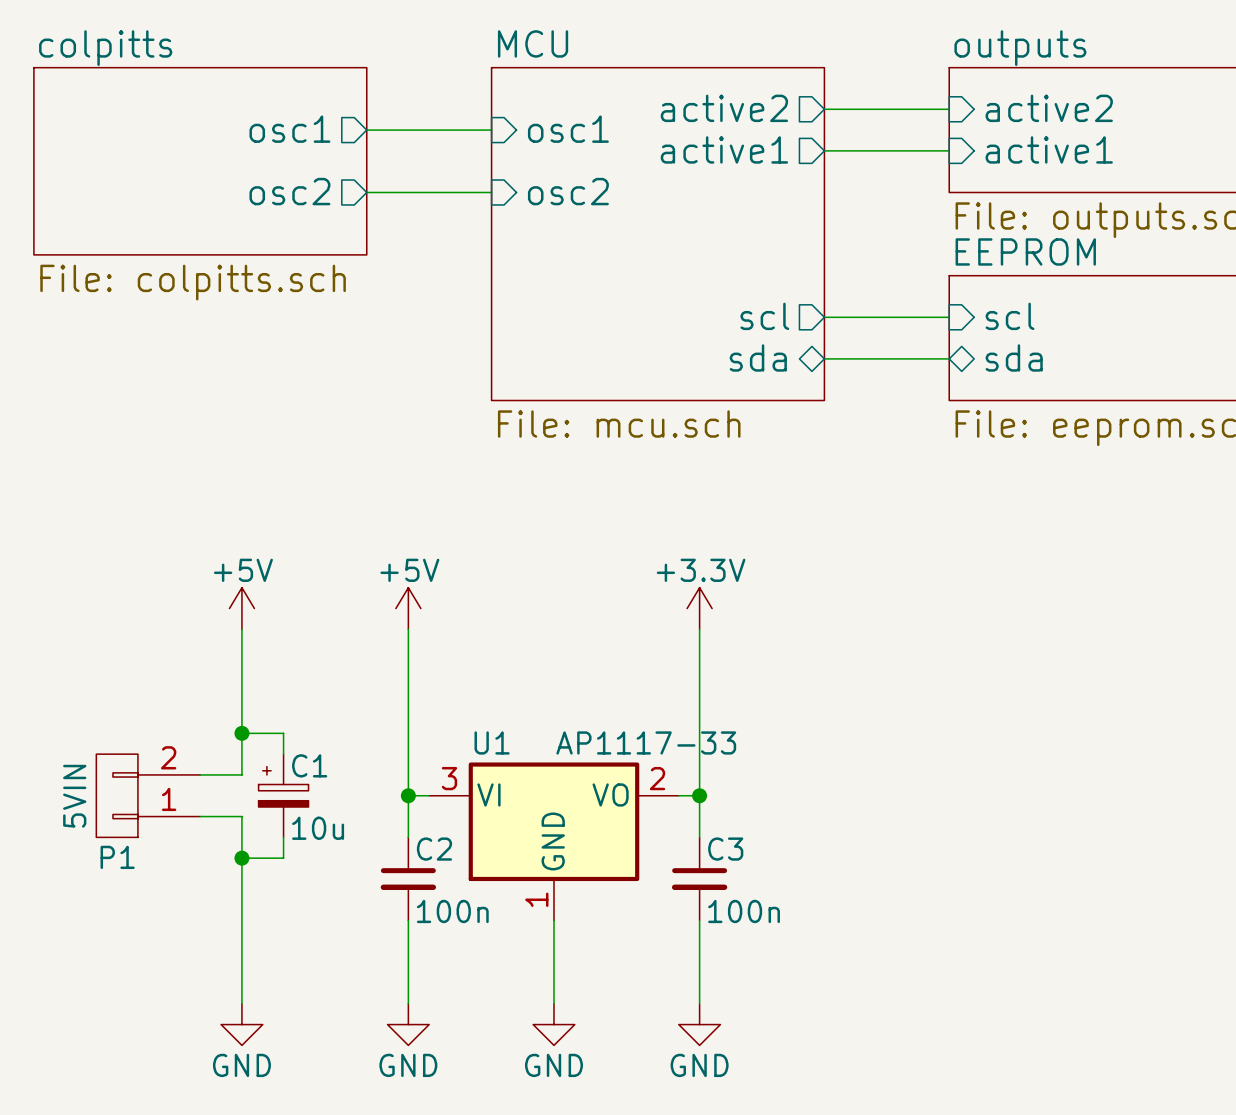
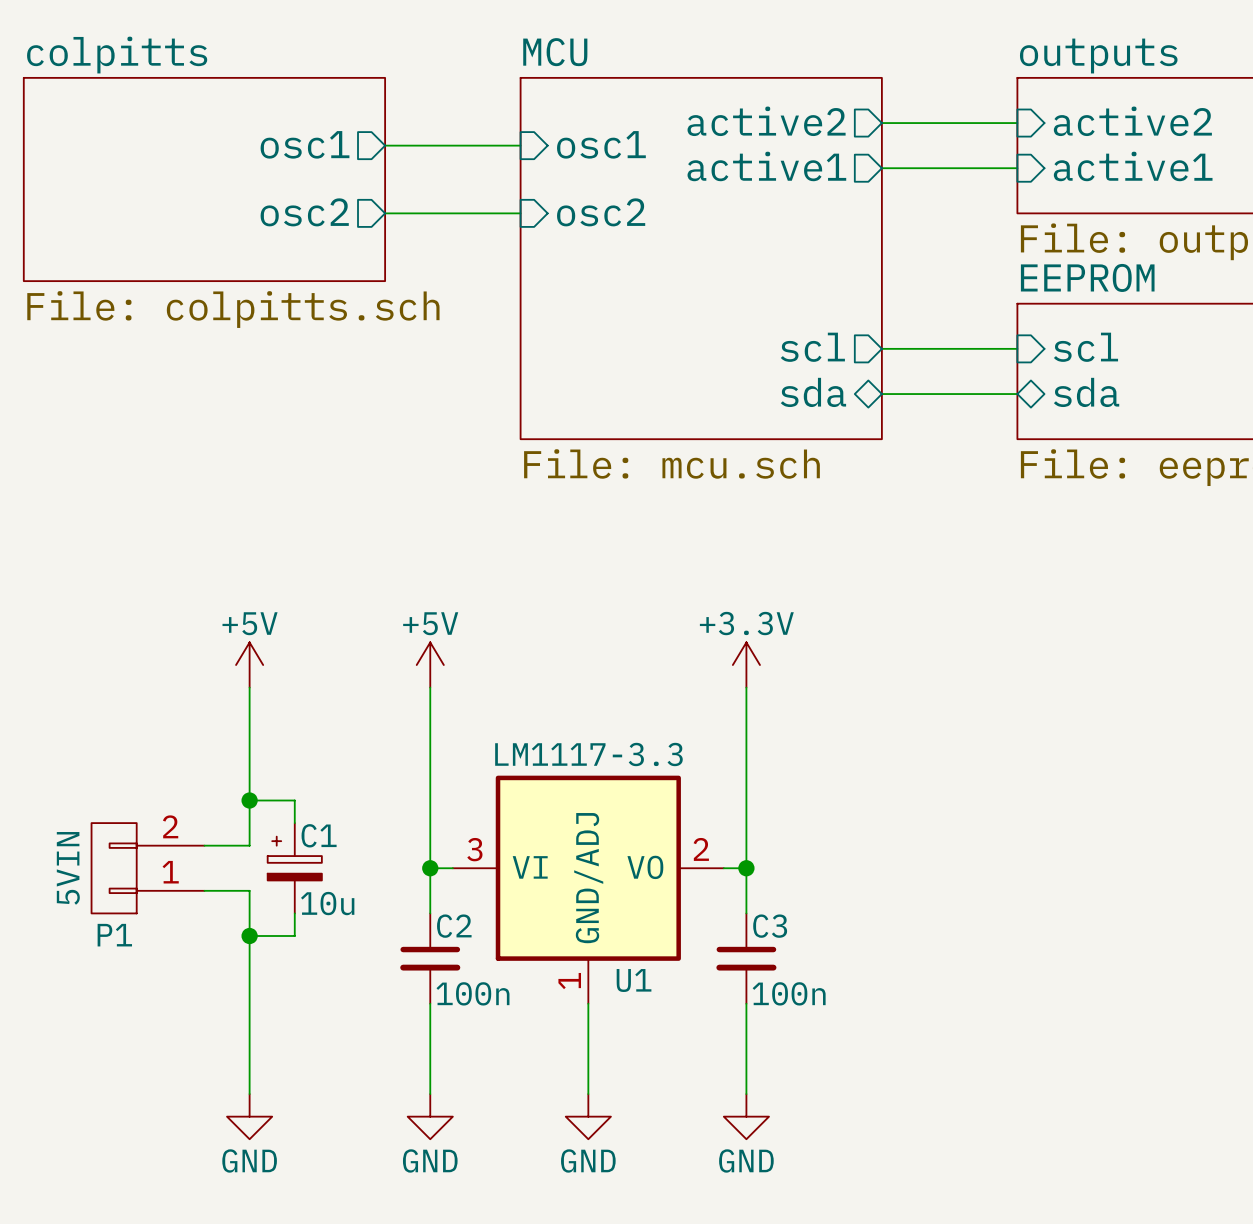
U1 name position: U1 (492, 742) -> U1 (634, 980)
U1 value: AP1117-33 (646, 742) -> LM1117-3.3 (588, 754)
U1 symbol: [429, 762, 679, 921] -> [452, 775, 724, 1004]

